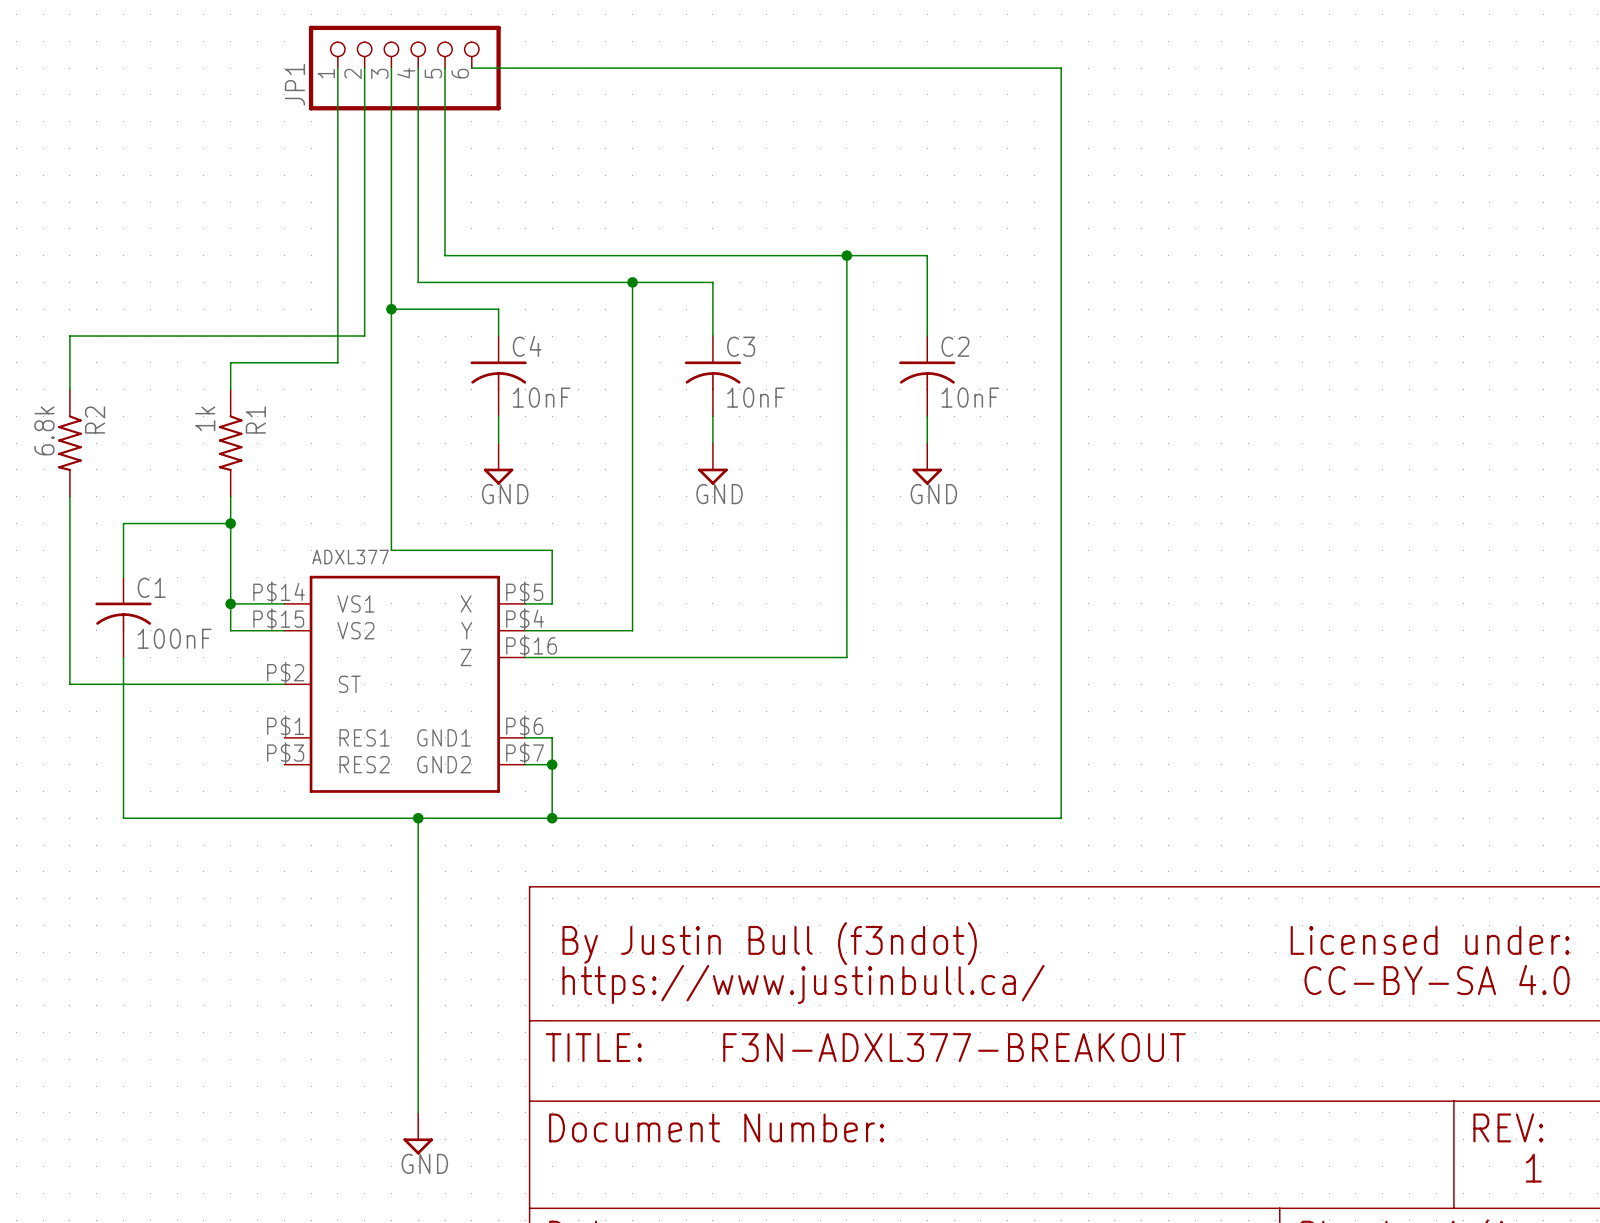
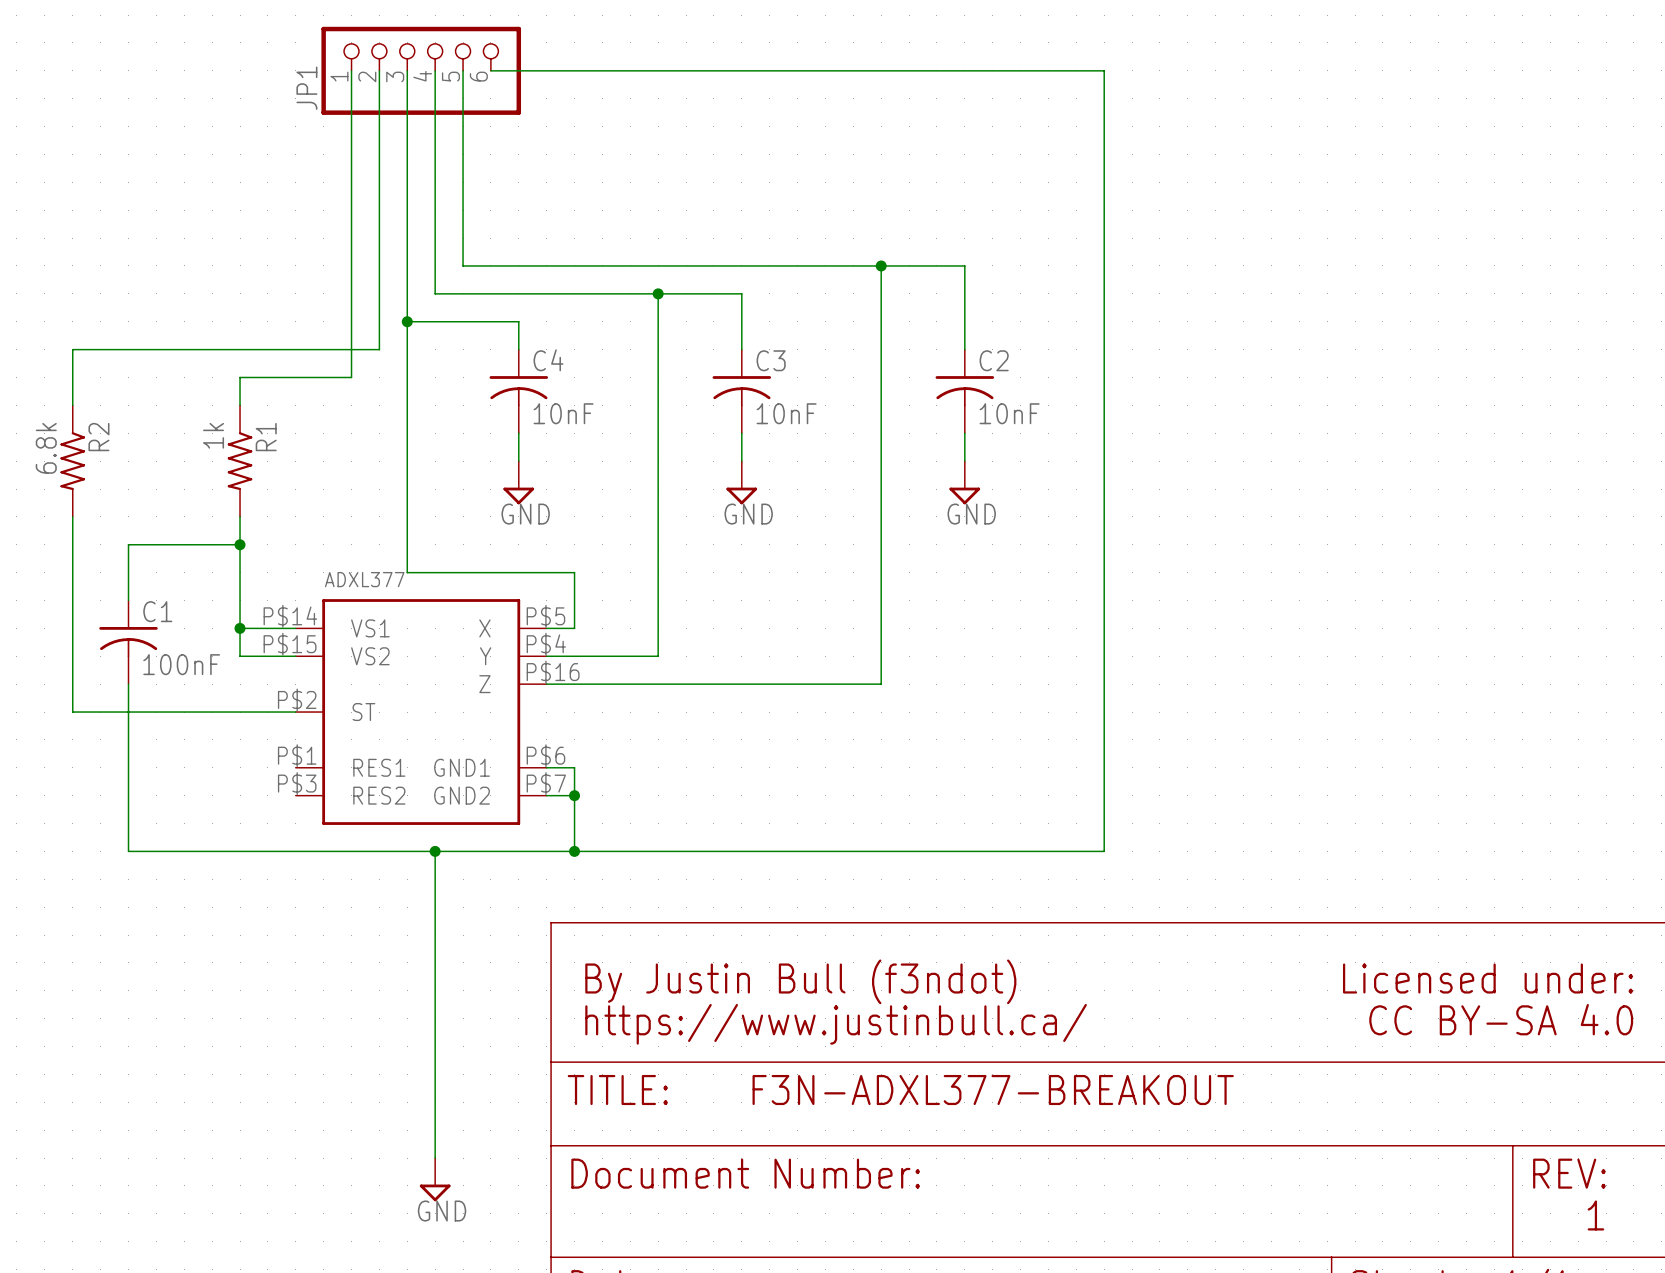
text: CC-BY-SA 4.0 (1437, 979) -> CC BY-SA 4.0 (1501, 1019)

